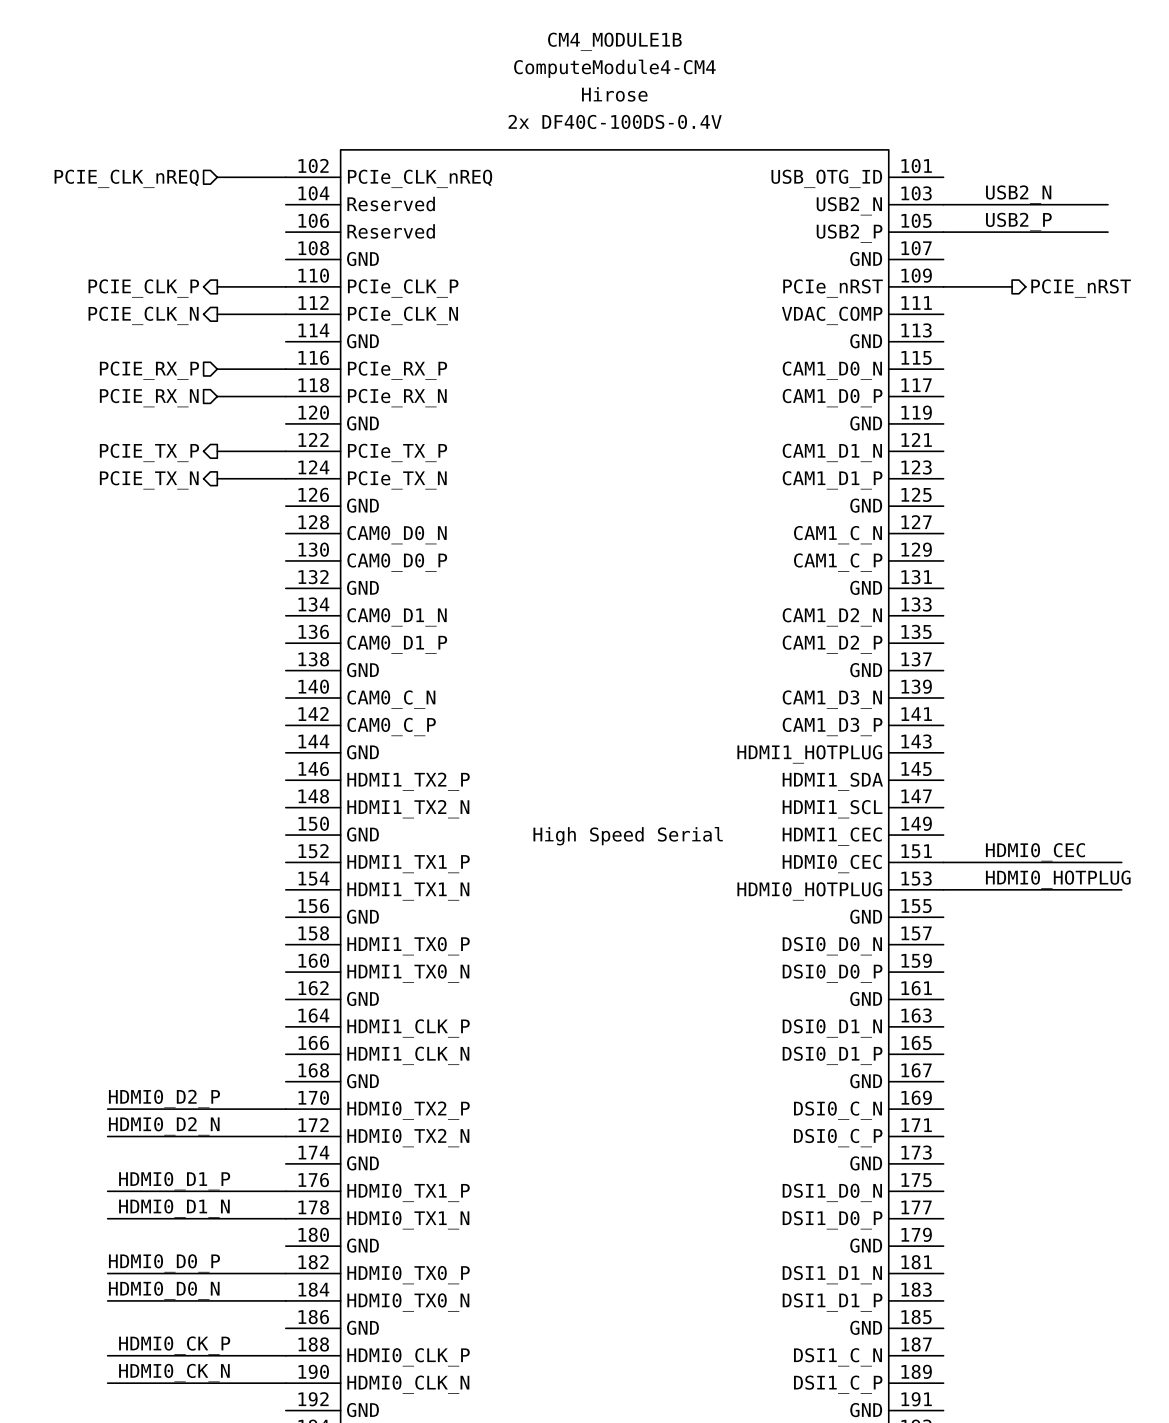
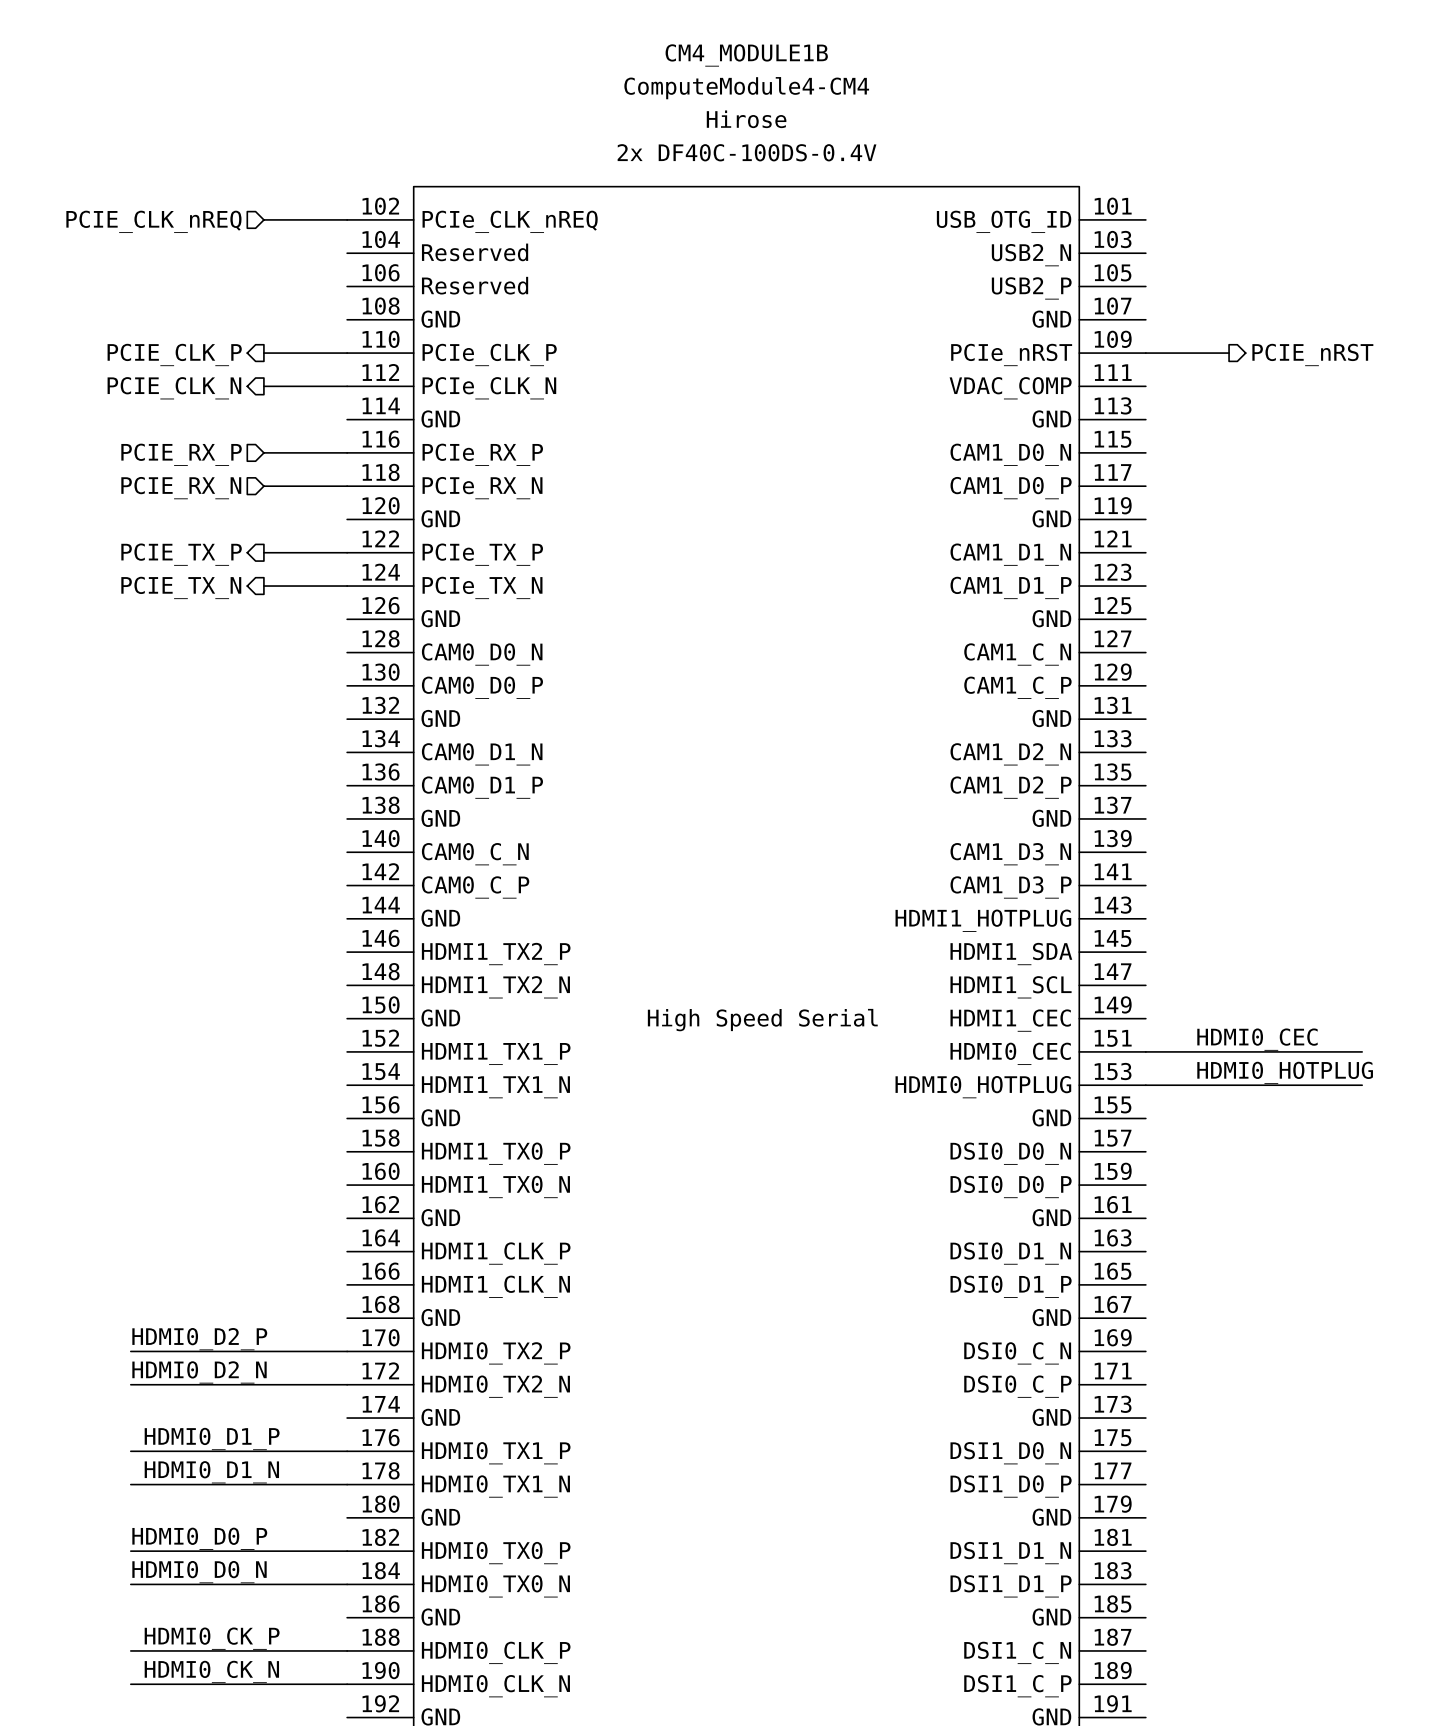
label: USB2_N (1018, 194) -> none
wire: (943, 204) (1108, 204) -> none
label: USB2_P (1018, 221) -> none
wire: (943, 232) (1108, 232) -> none

